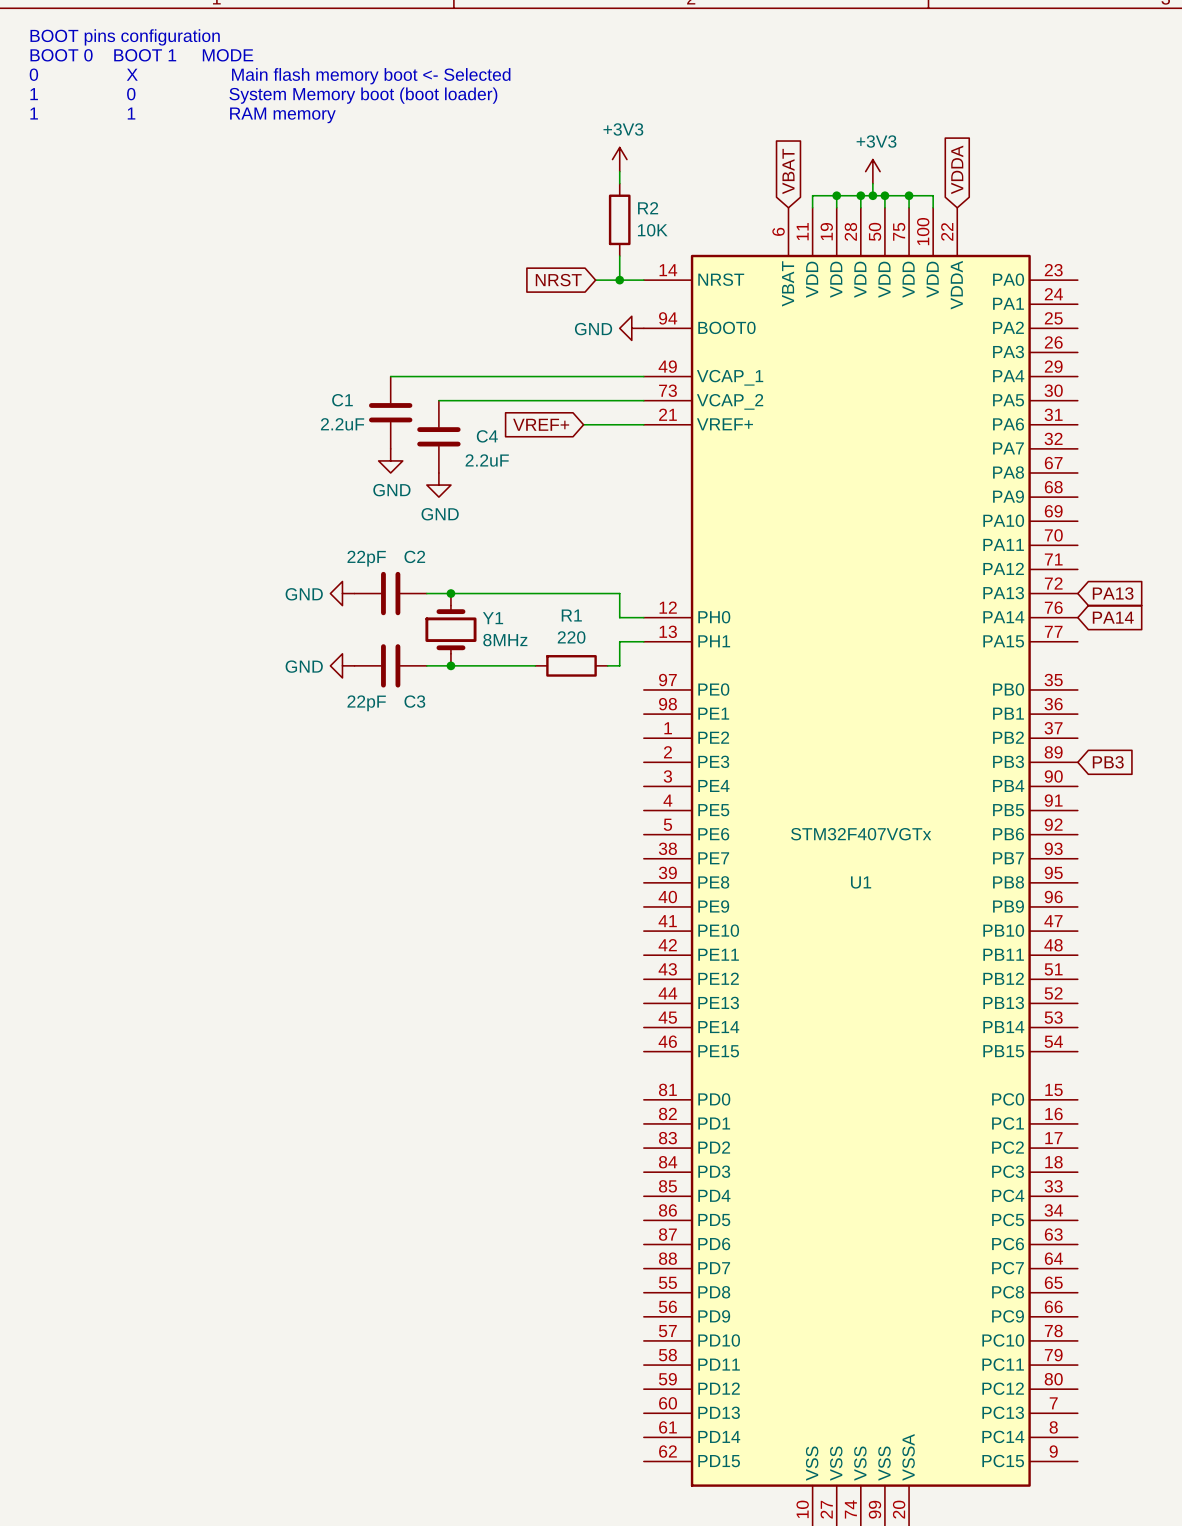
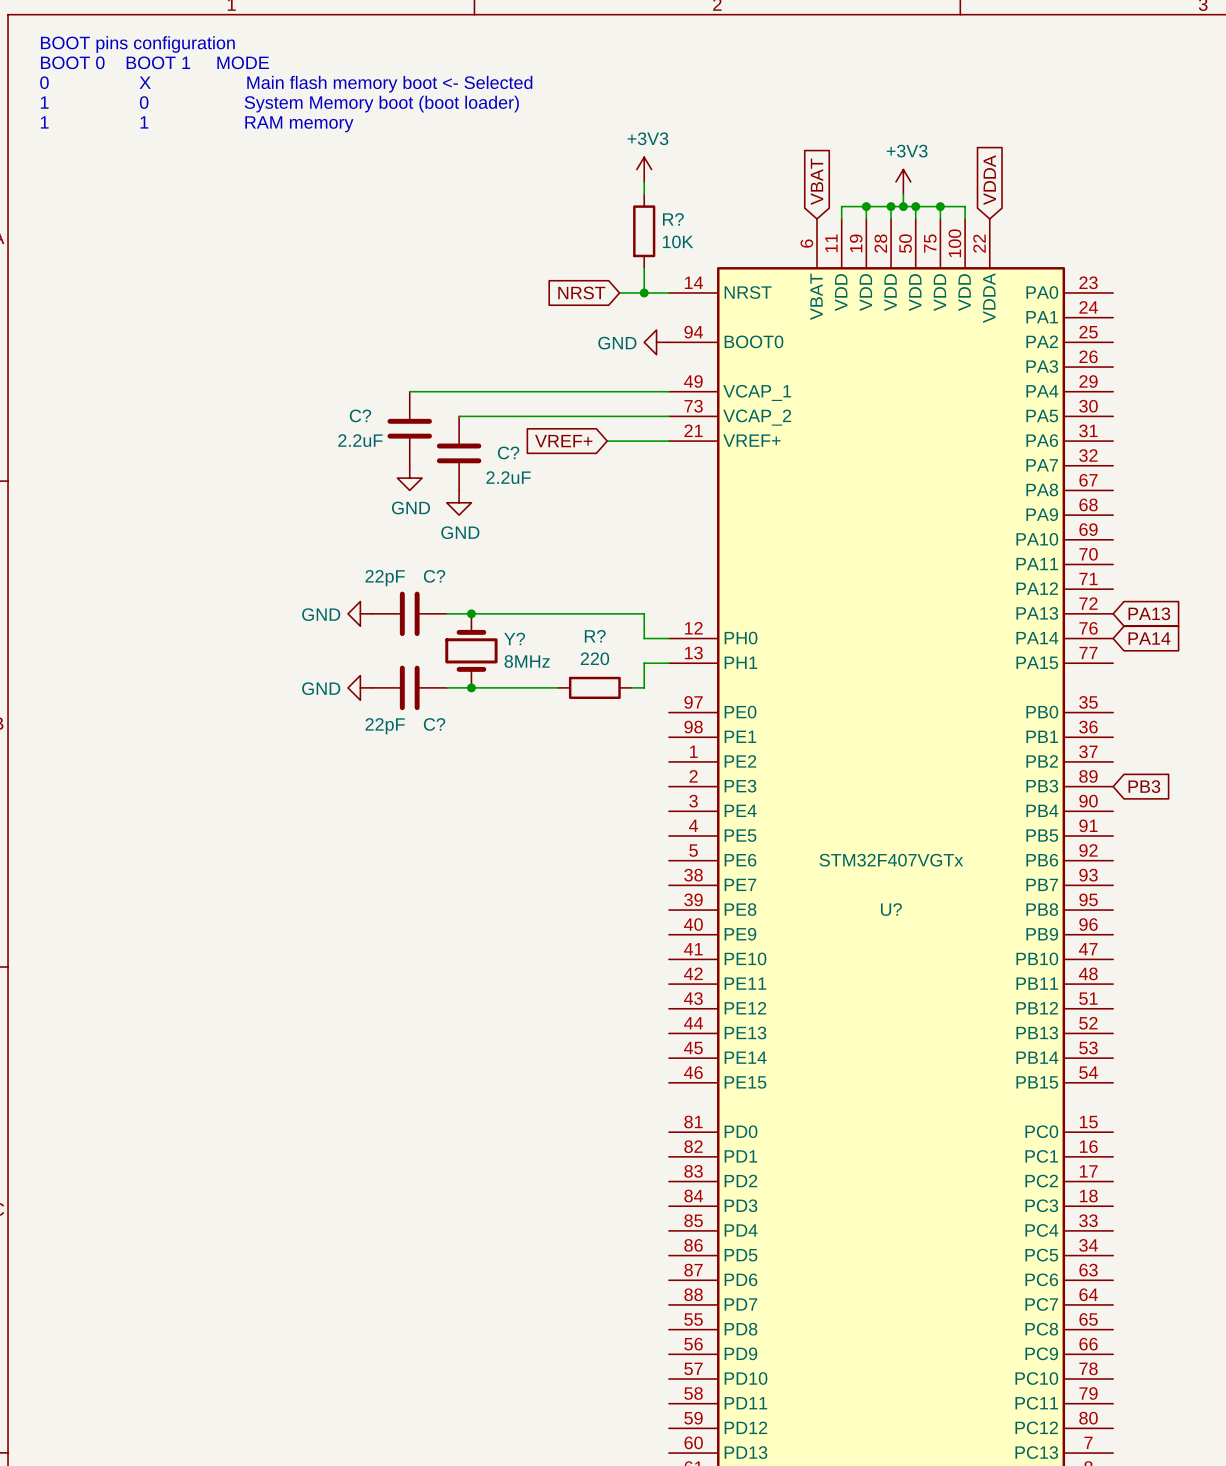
R2 name: R2 (648, 208) -> R? (673, 219)
C1 name: C1 (342, 400) -> C? (360, 415)
C4 name: C4 (487, 436) -> C? (508, 452)
C2 name: C2 (414, 556) -> C? (434, 576)
R1 name: R1 (571, 615) -> R? (595, 636)
Y1 name: Y1 (493, 618) -> Y? (514, 638)
C3 name: C3 (414, 701) -> C? (434, 724)
U1 name: U1 (861, 882) -> U? (891, 909)

